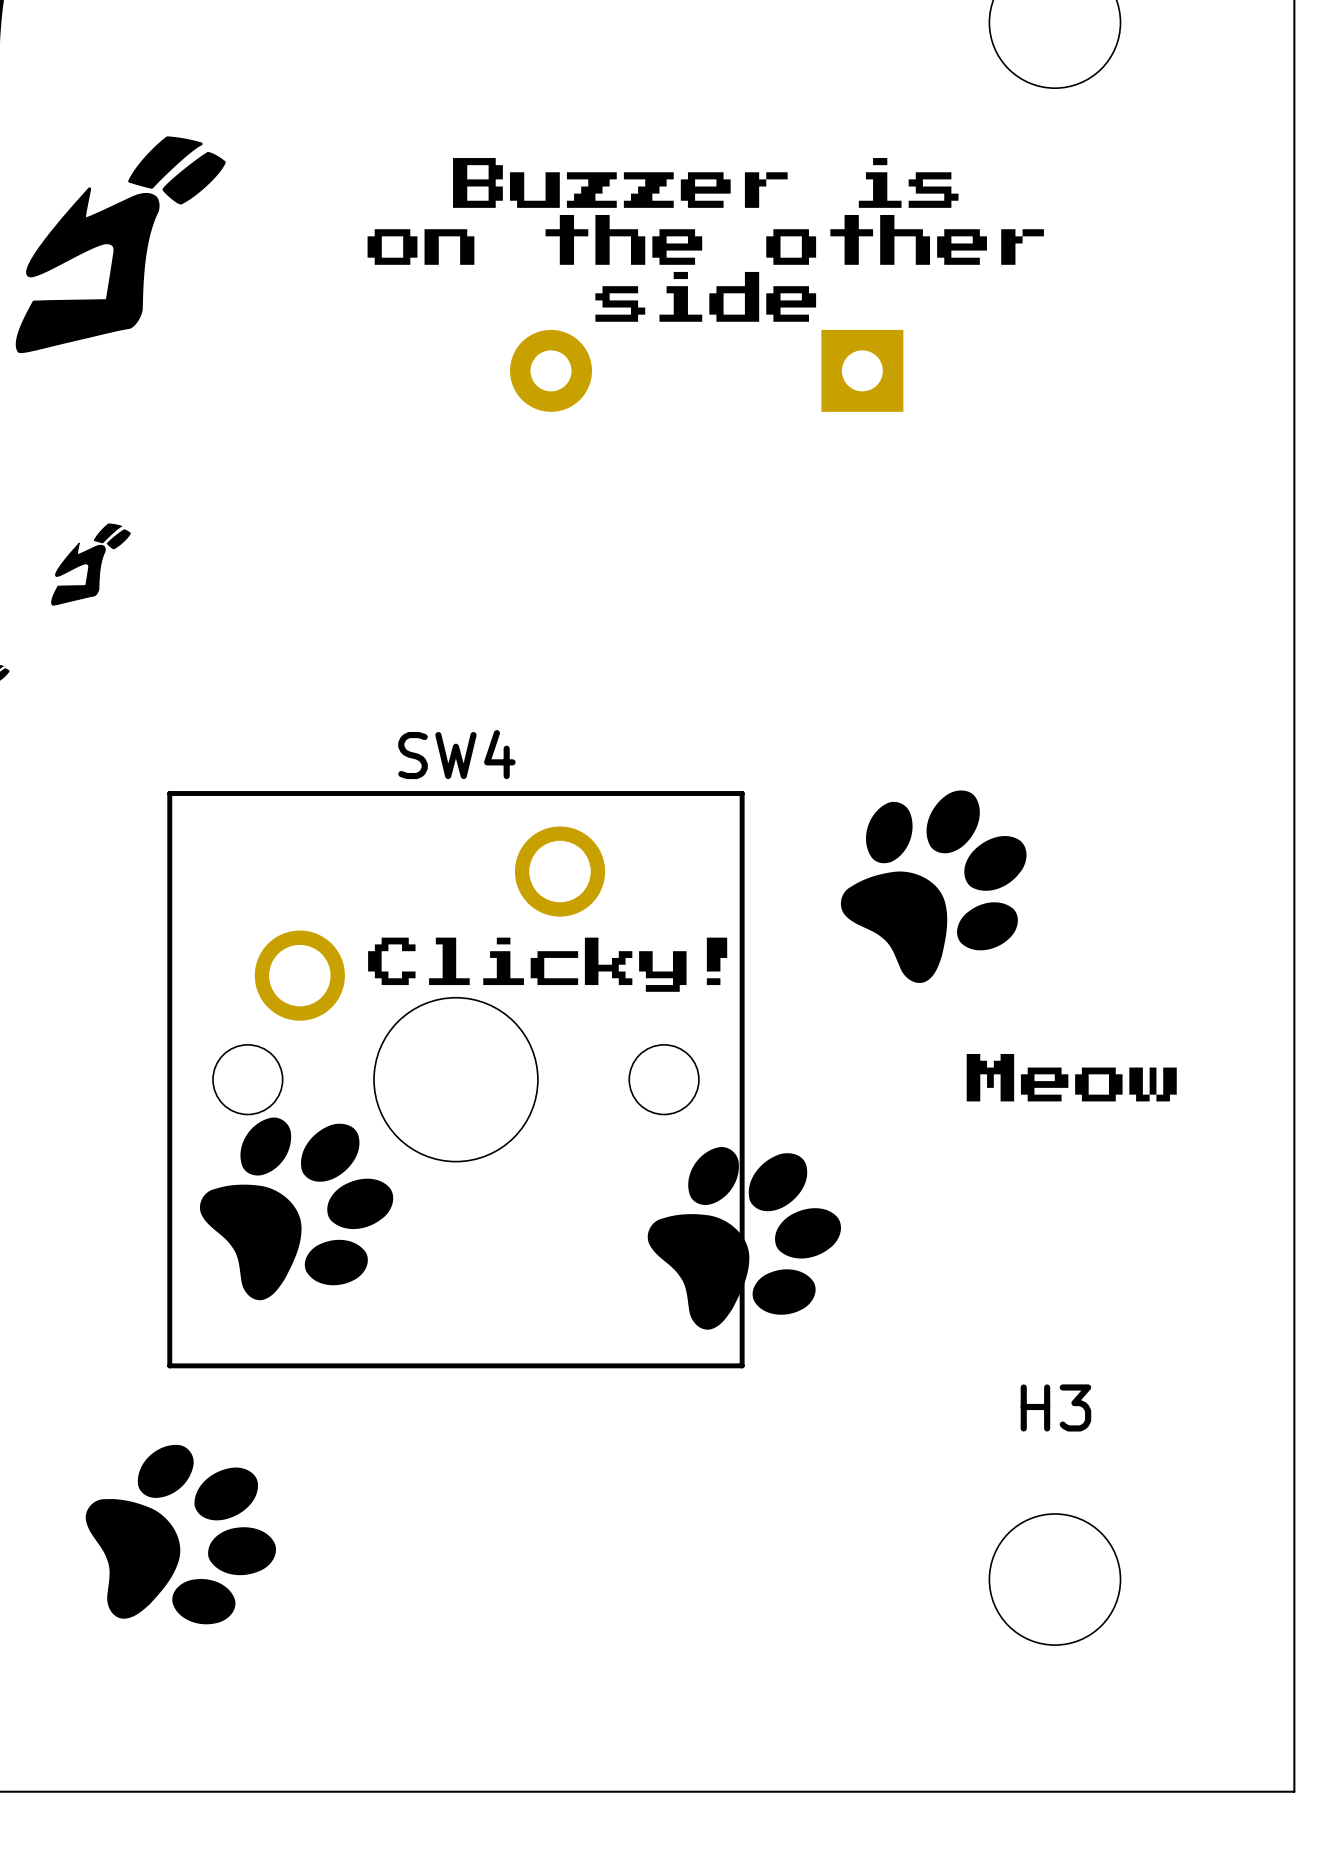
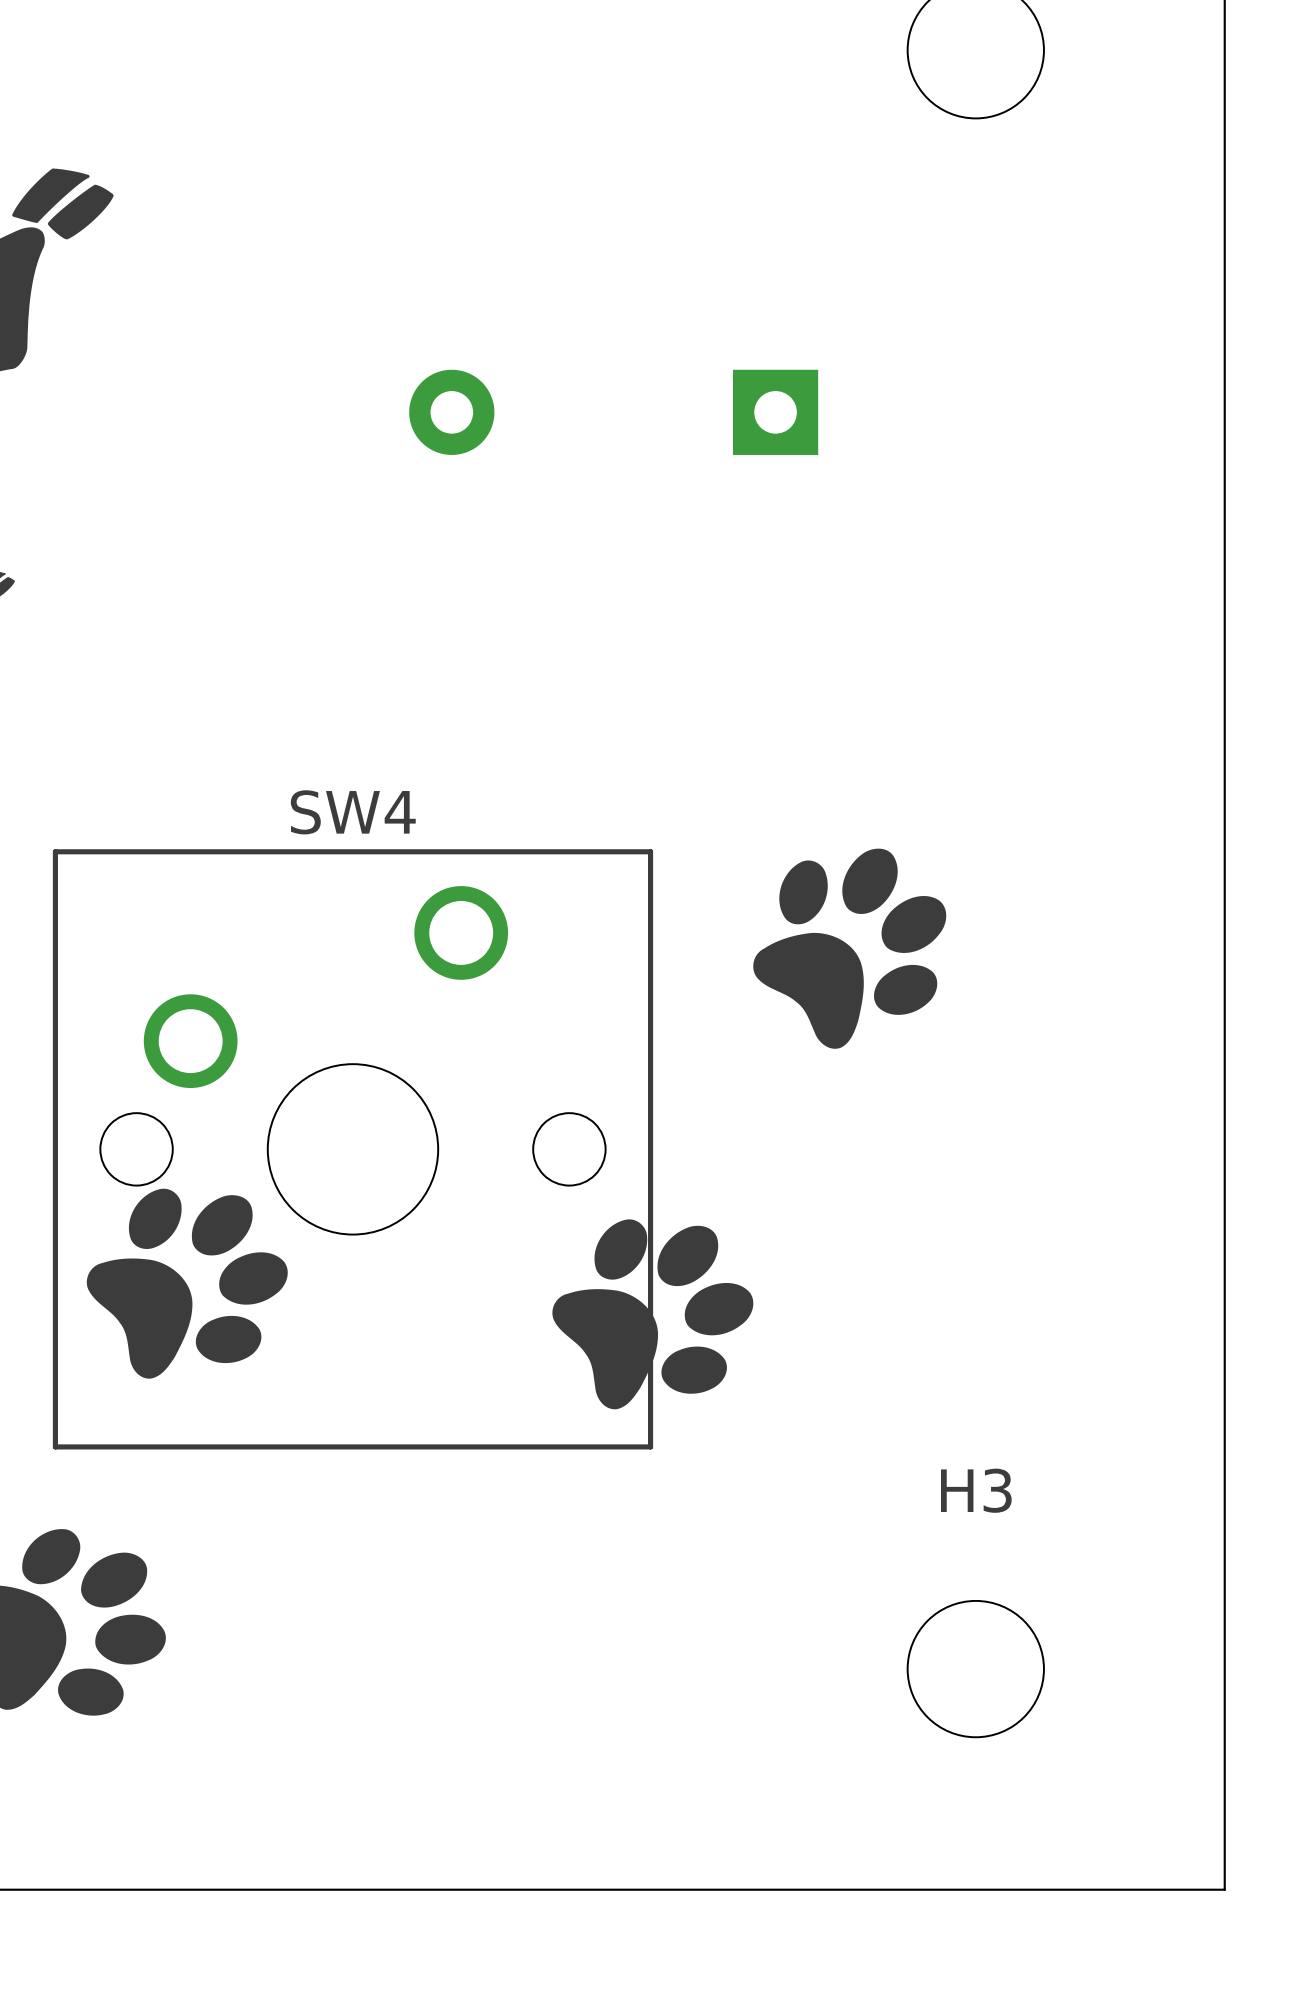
drawing: [367, 158, 1044, 322] -> none
drawing: [368, 937, 728, 992] -> none
drawing: [966, 1054, 1177, 1102] -> none

